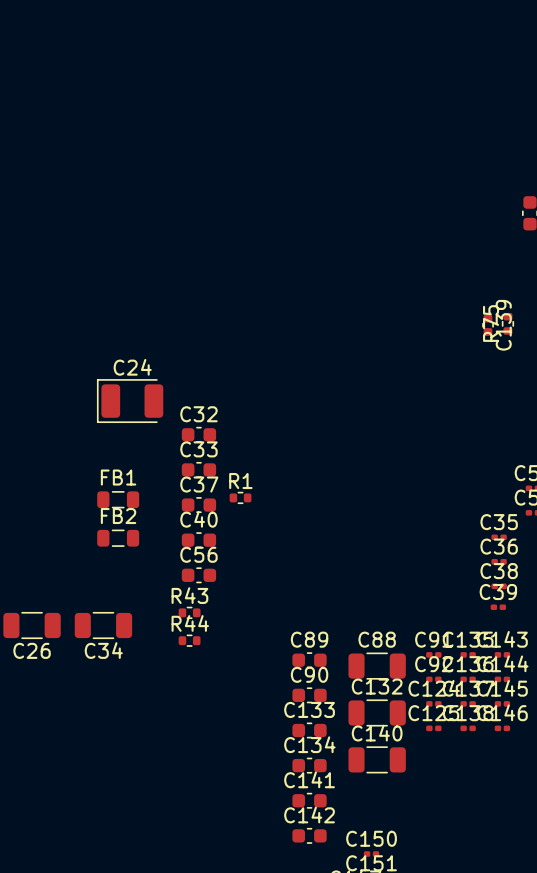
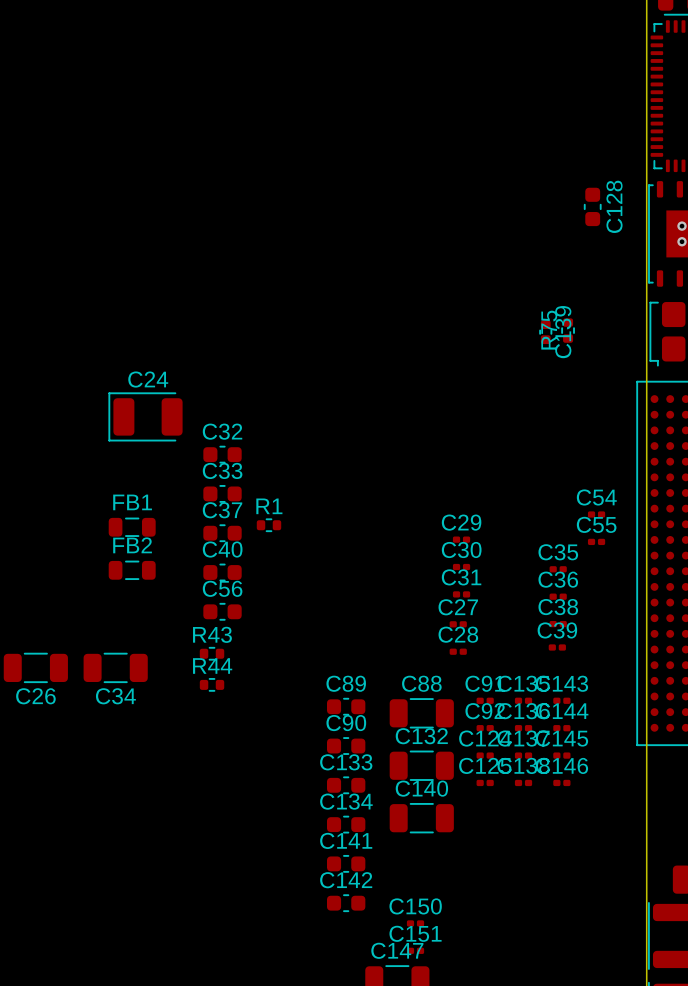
C29: none -> (461, 539)
C30: none -> (461, 567)
C31: none -> (461, 594)
C27: none -> (458, 624)
C28: none -> (458, 651)

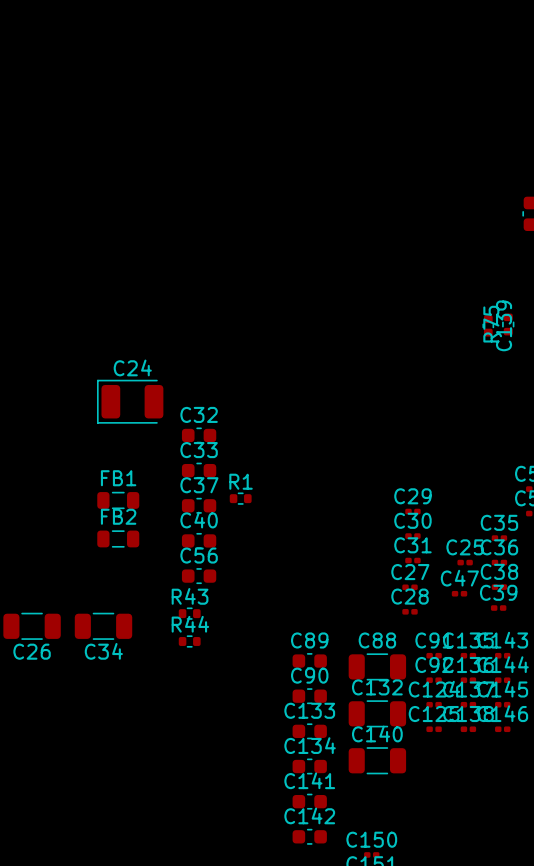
C25: none -> (465, 562)
C47: none -> (459, 593)

